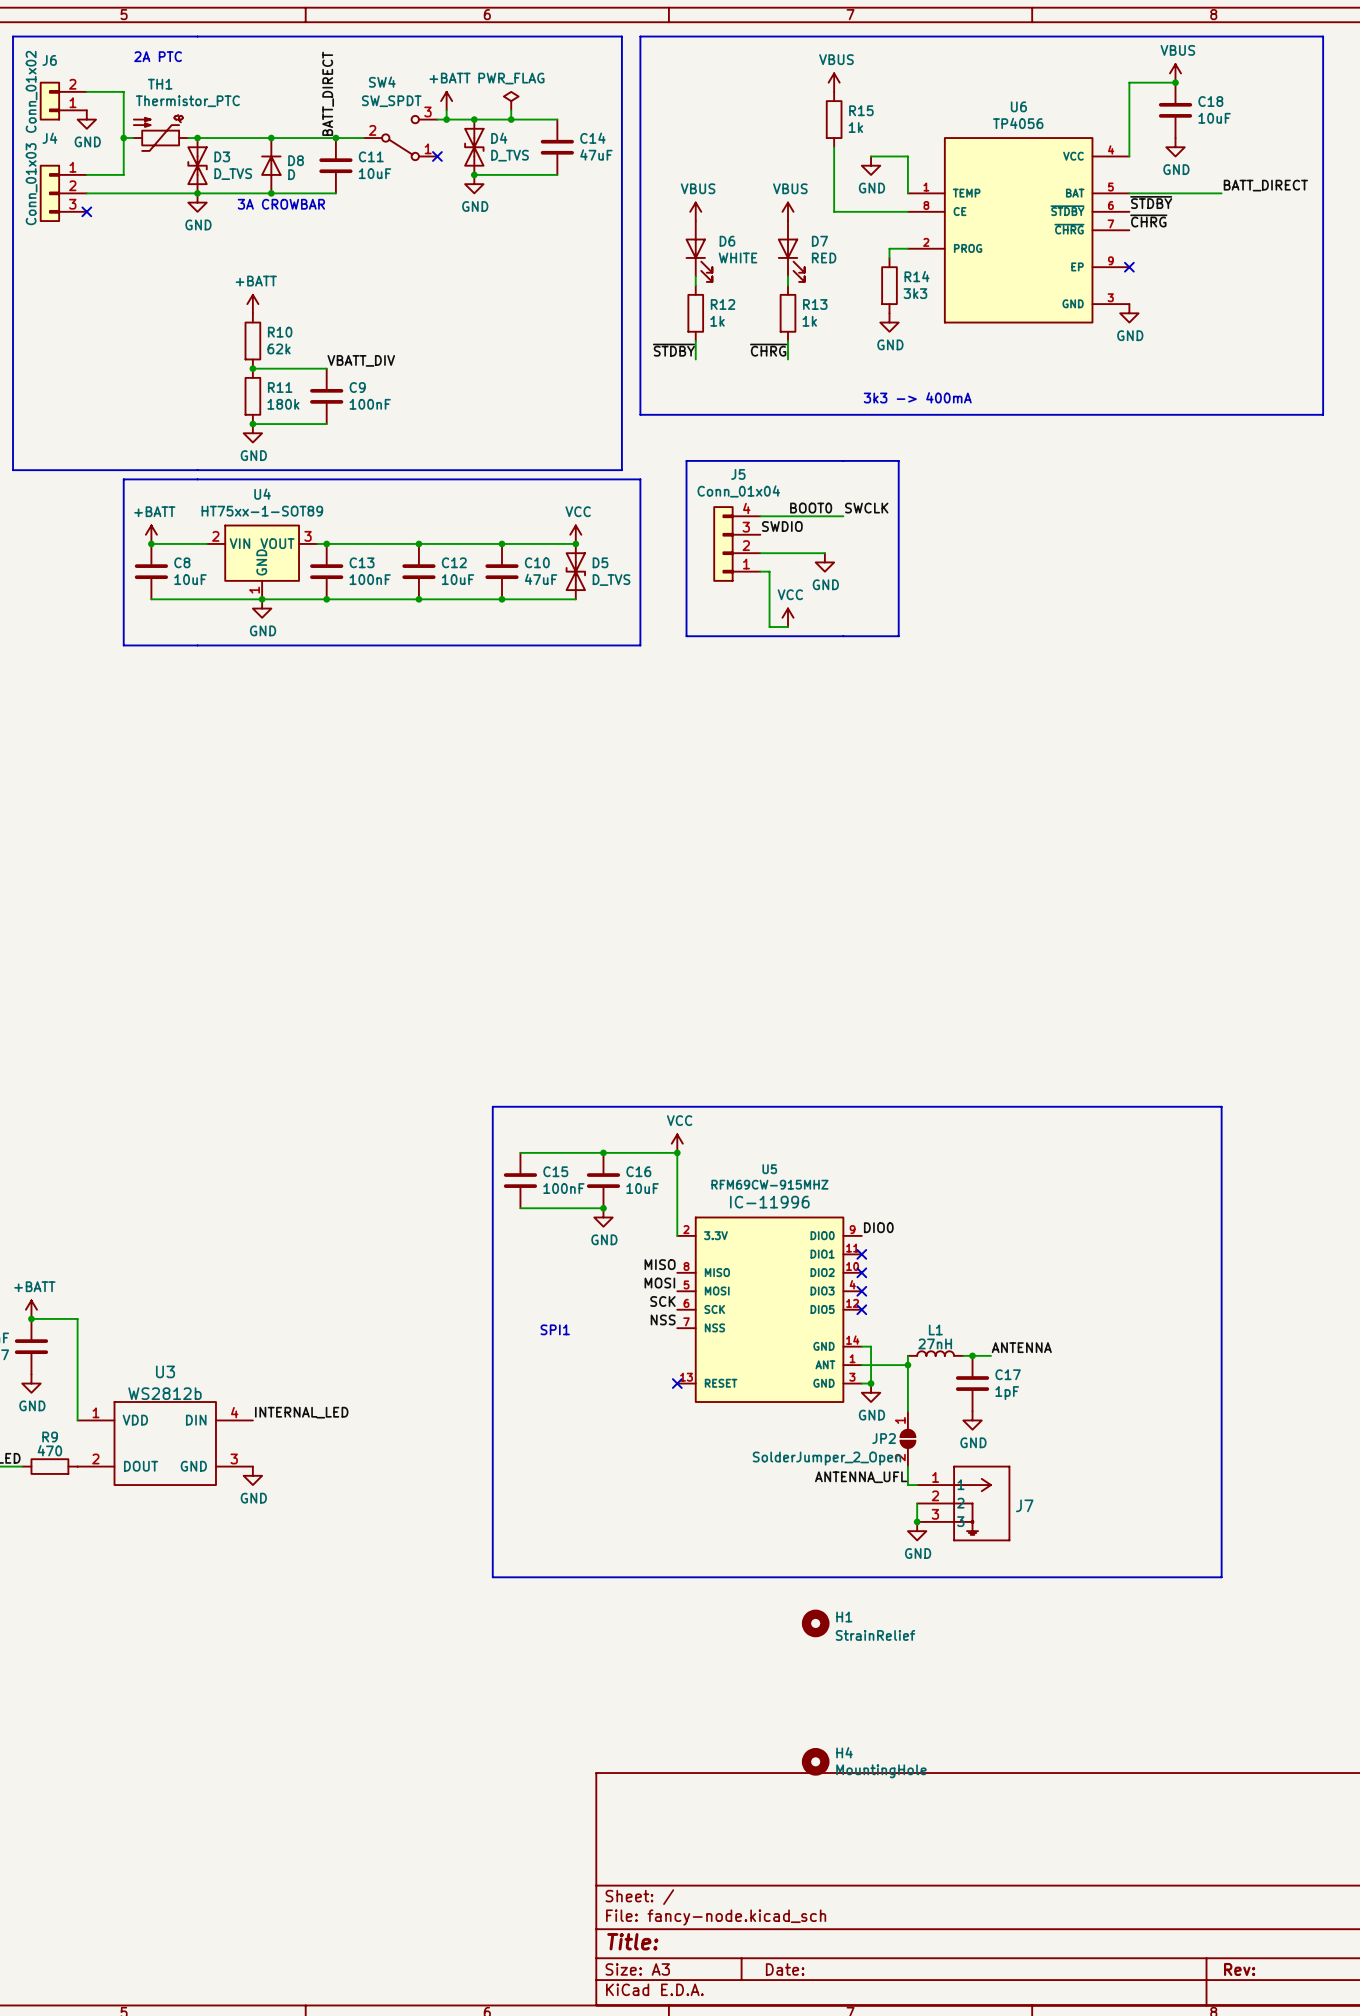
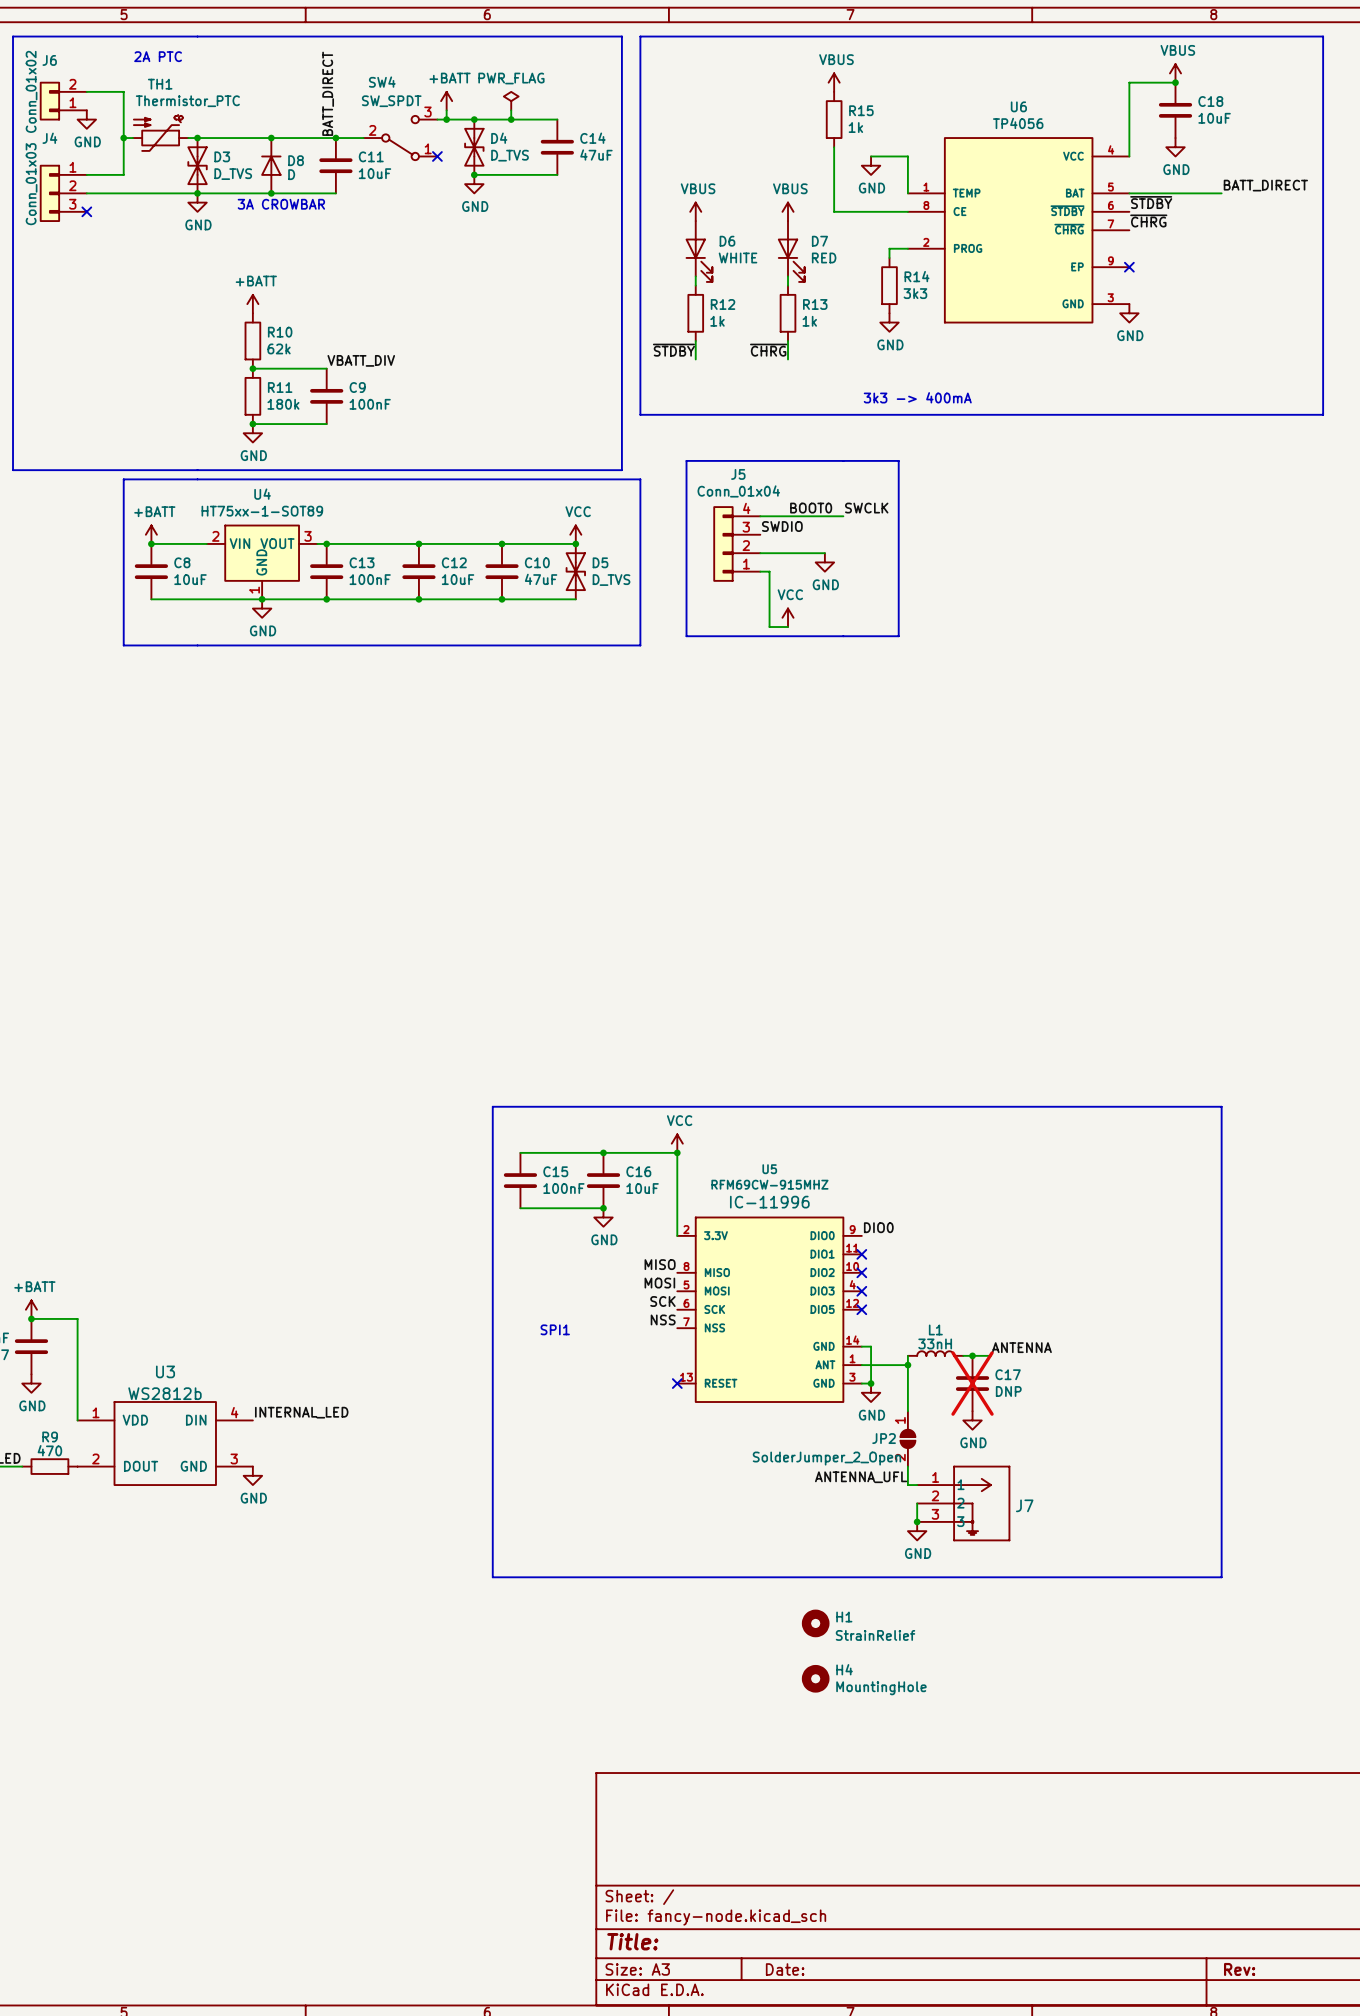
L1 value: 27nH (935, 1343) -> 33nH (935, 1343)
C17 do-not-place cross: none -> (972, 1383)
C17 value: 1pF (1007, 1393) -> DNP (1008, 1391)
H4 position: (815, 1761) -> (815, 1678)

